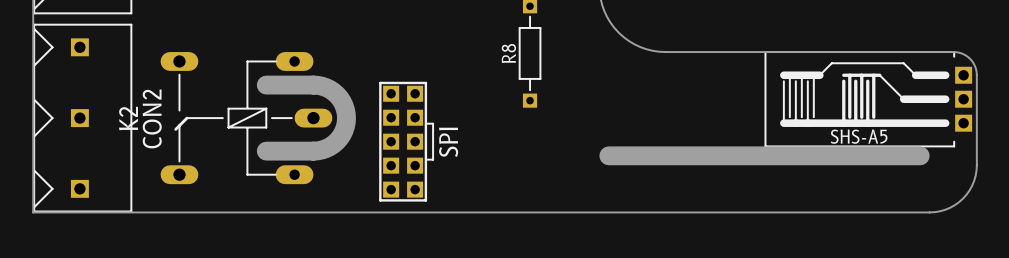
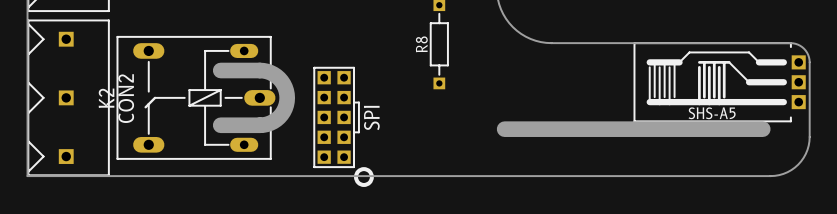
K2 footprint: [160, 52, 333, 185] -> [116, 36, 276, 160]
SPI: (406, 141) -> none
SPI: none -> (343, 126)

